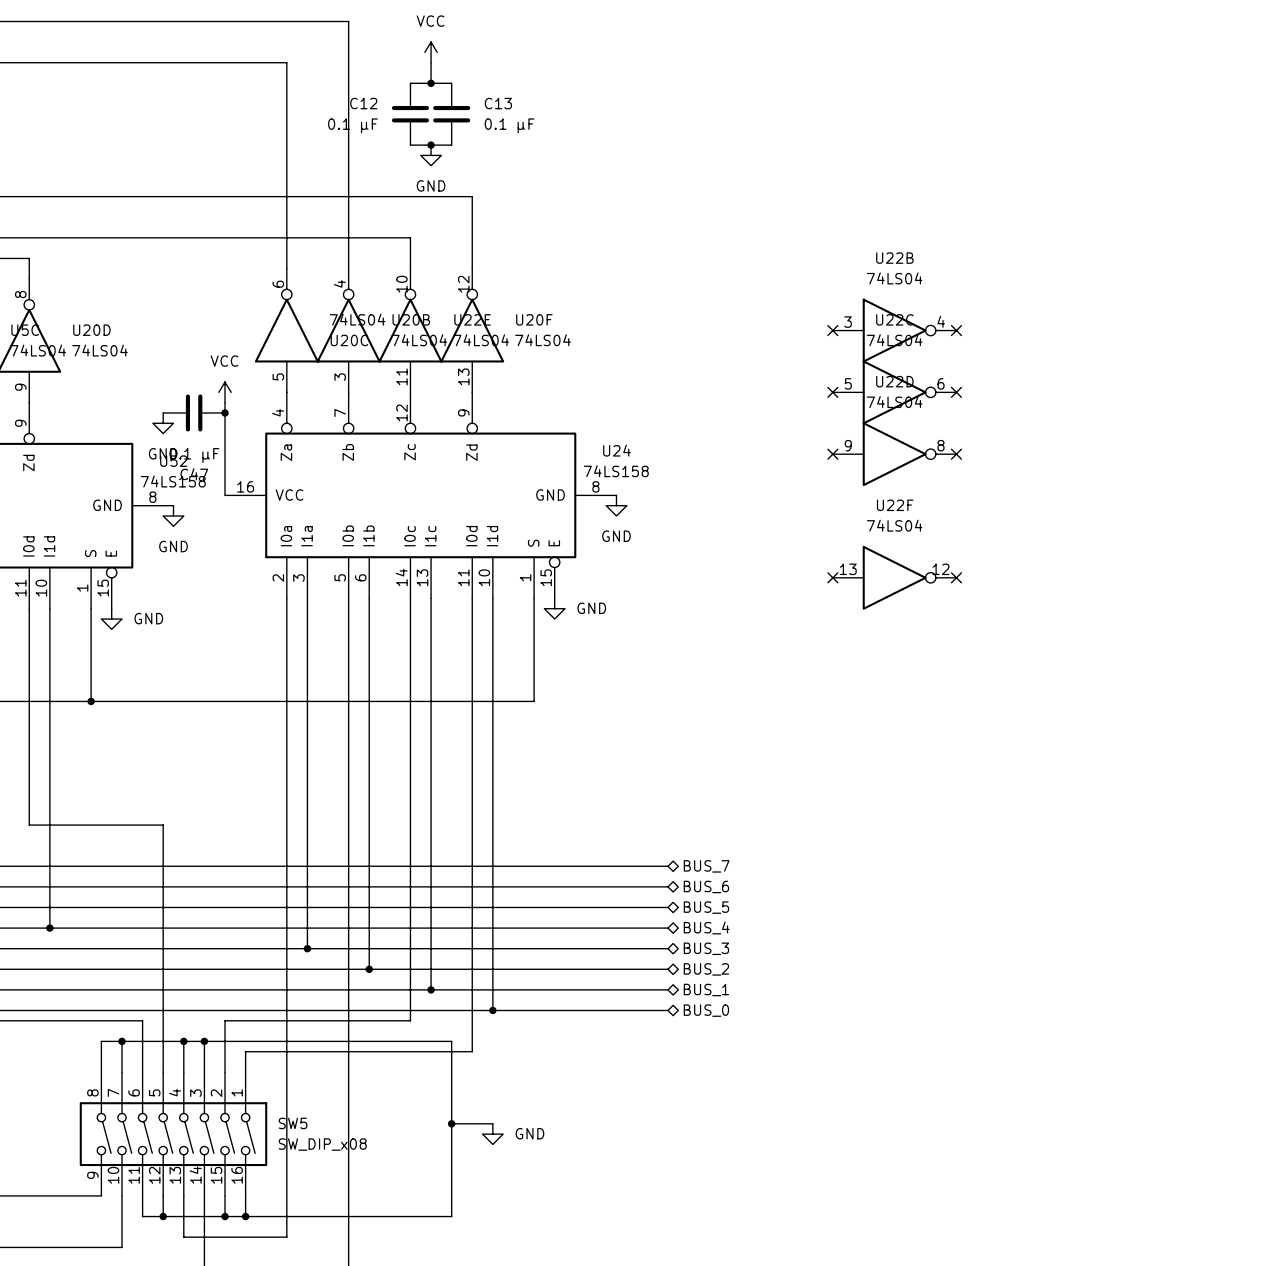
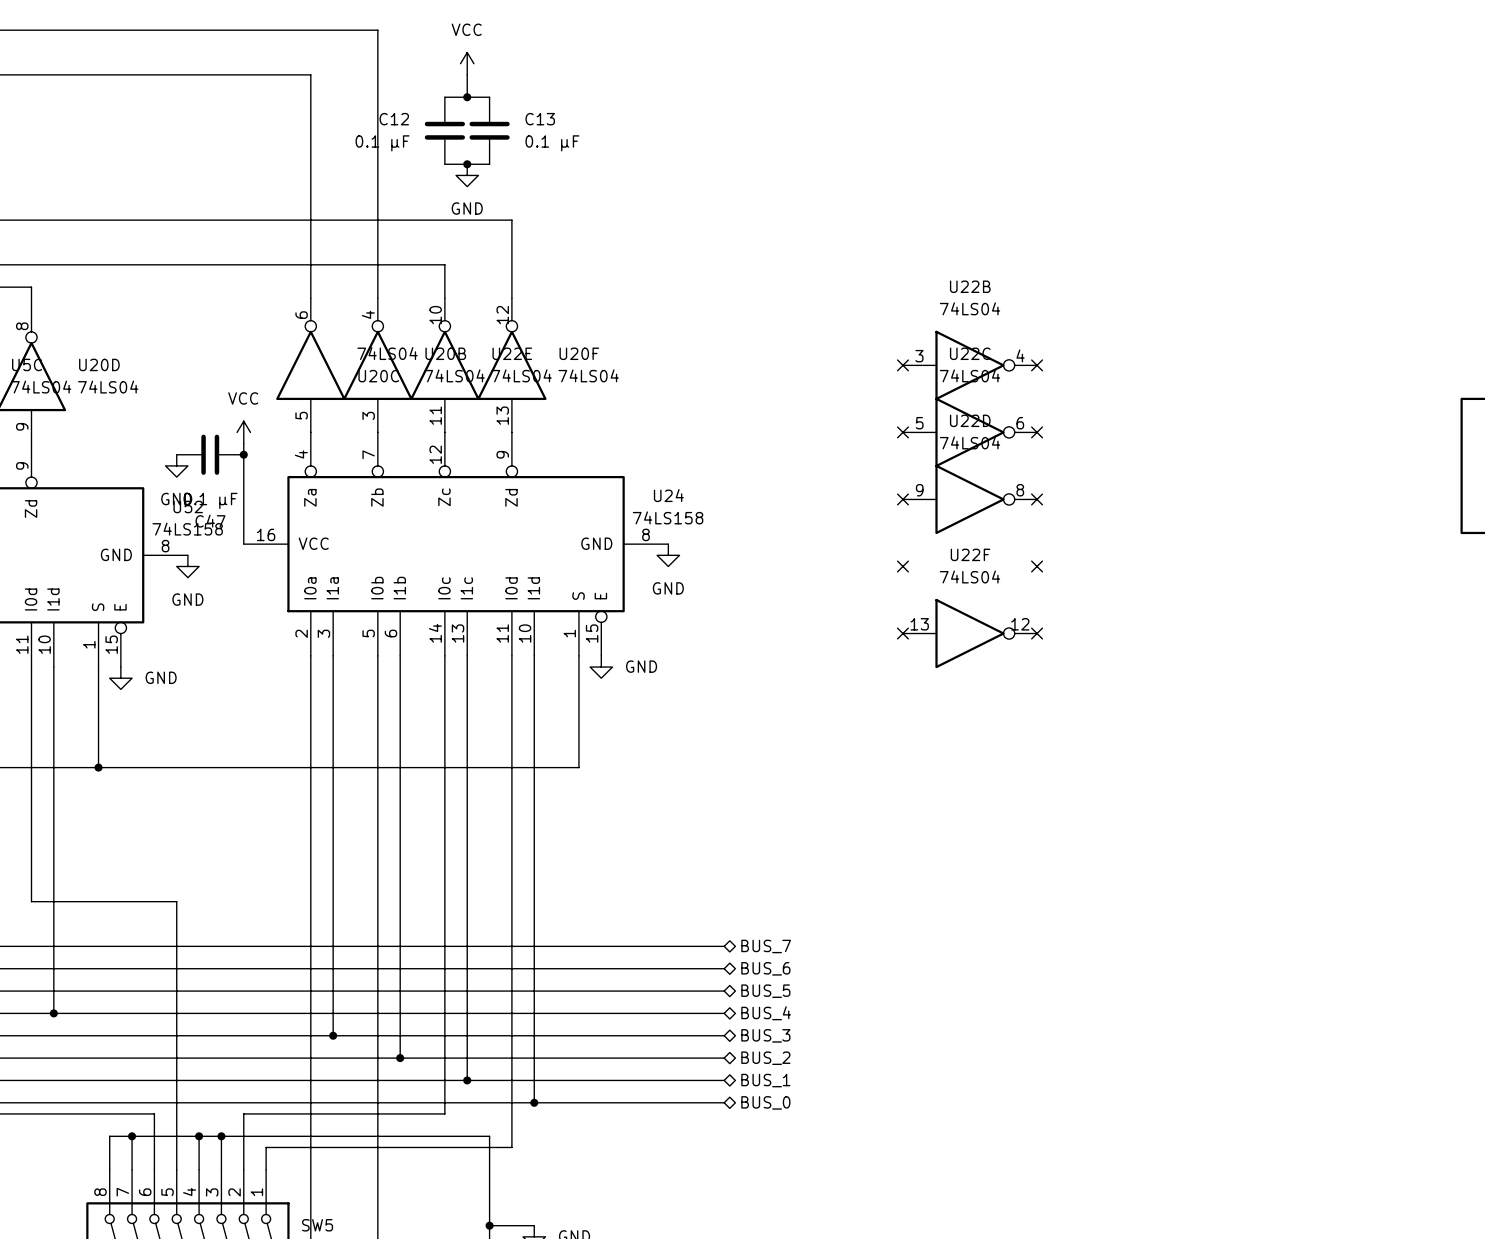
no-connect mark: none -> (902, 566)
no-connect mark: none -> (1037, 566)

